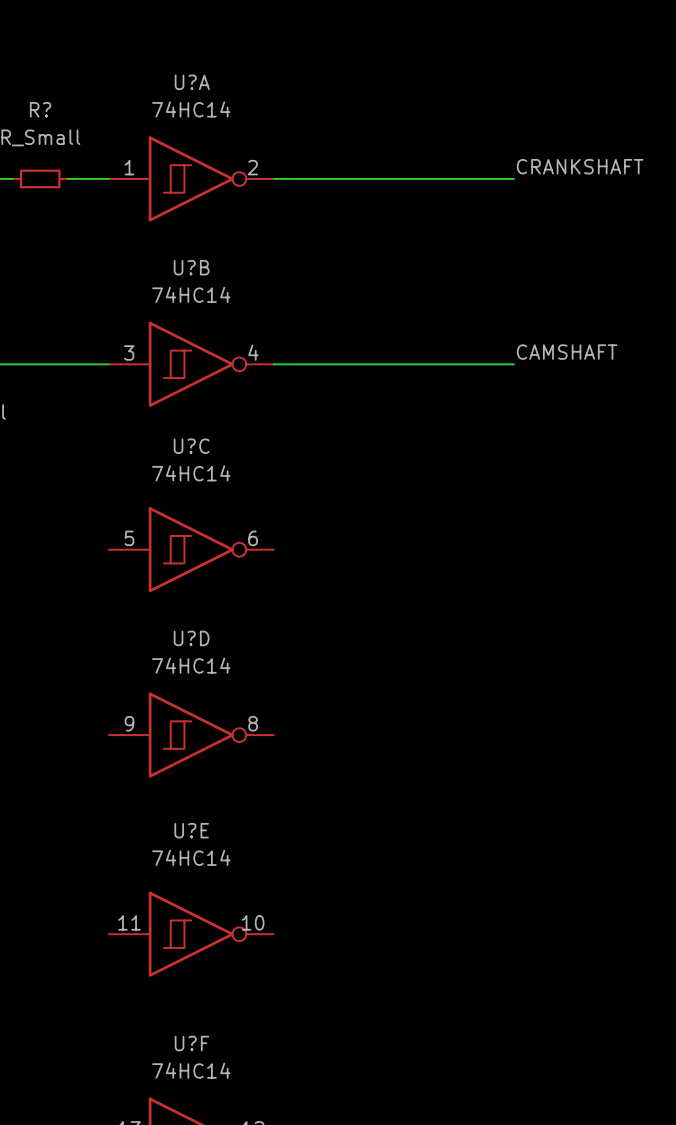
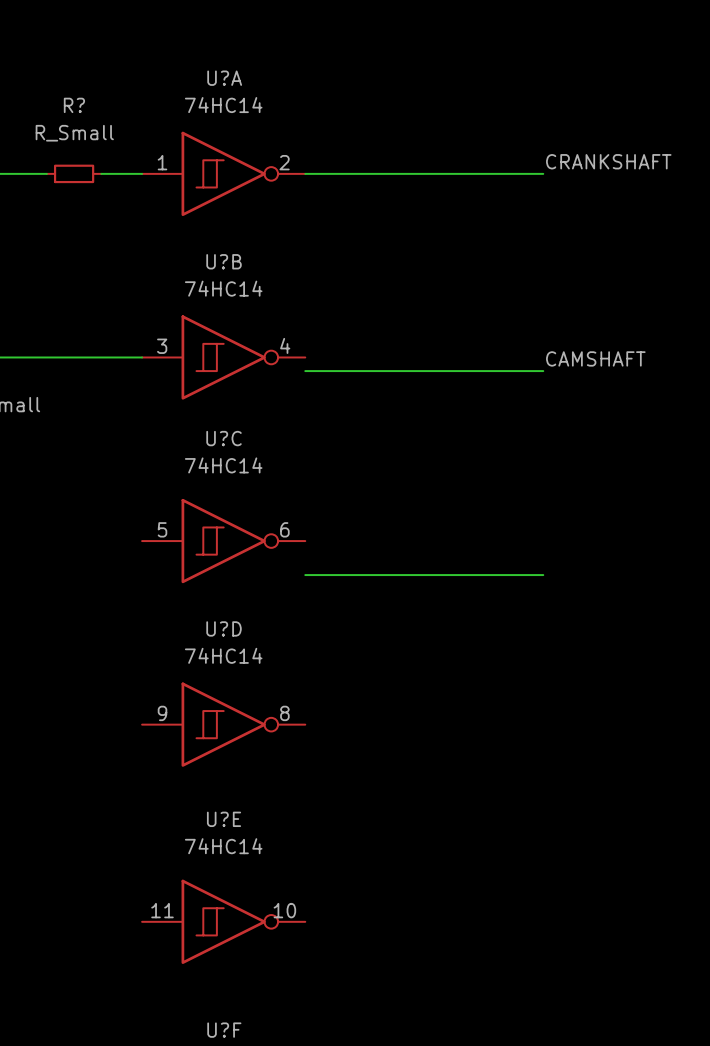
label position: CAMSHAFT (567, 352) -> CAMSHAFT (595, 358)
wire: (273, 364) (513, 364) -> (305, 371) (543, 371)
wire: none -> (305, 575) (543, 575)

